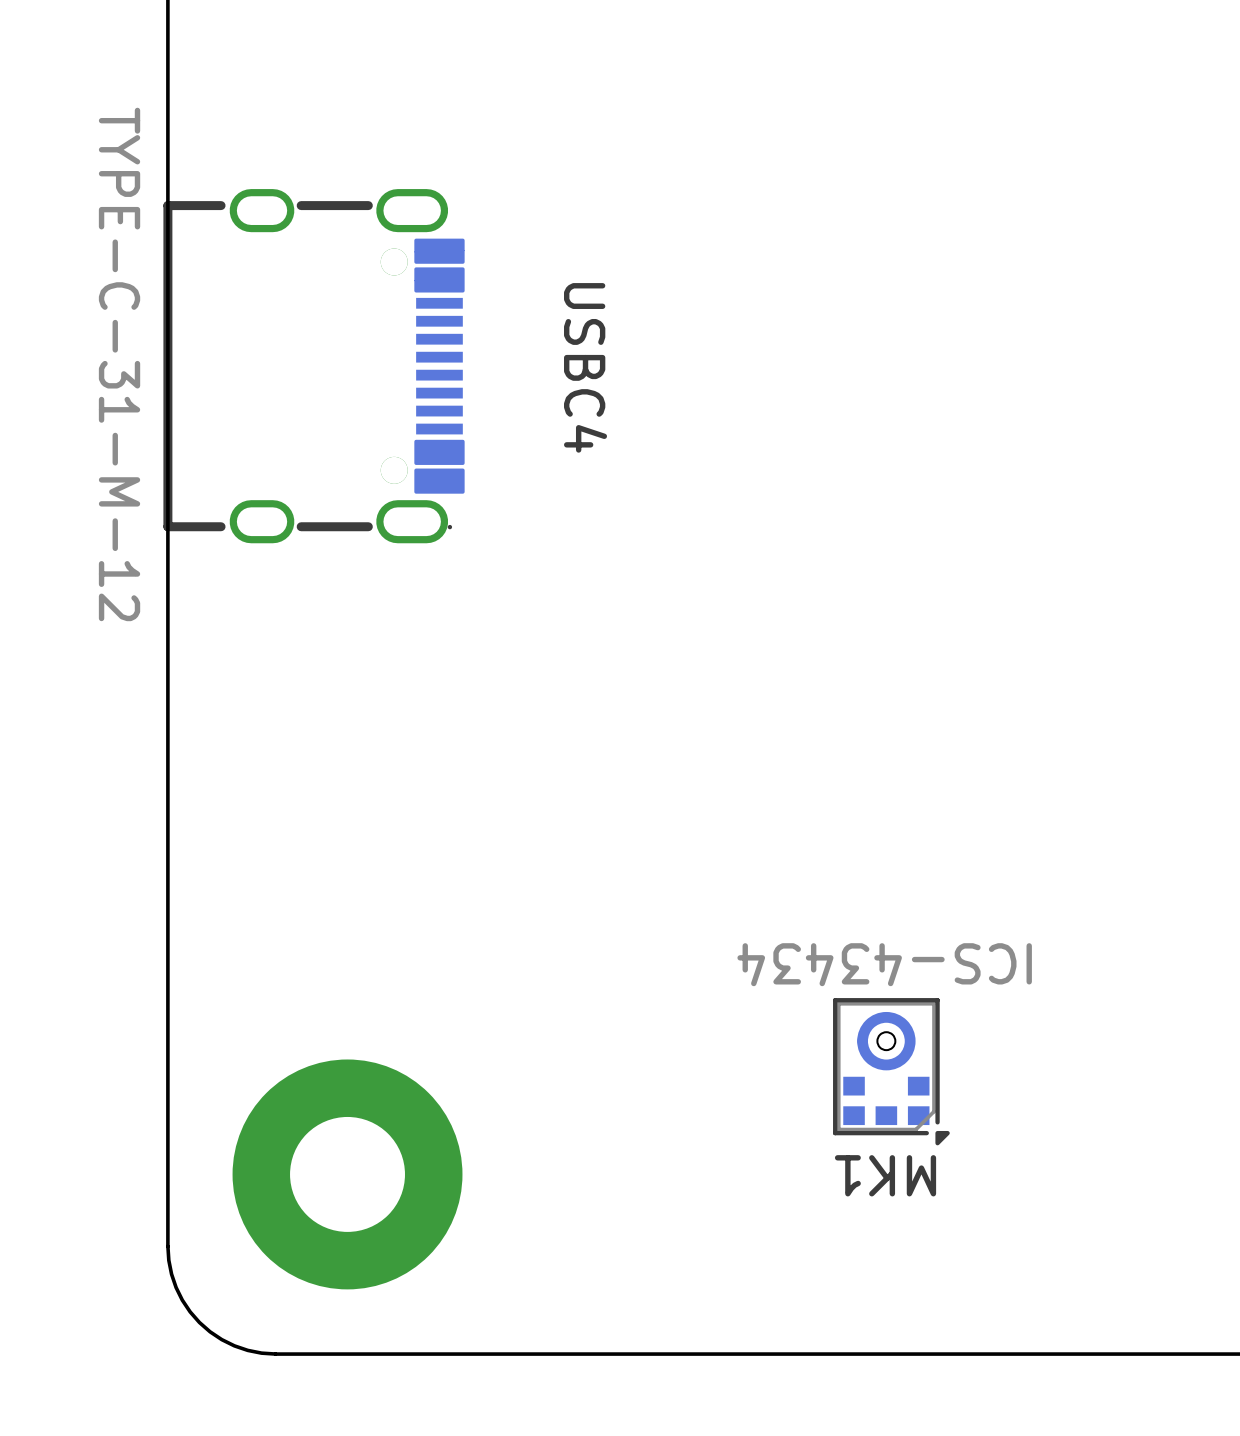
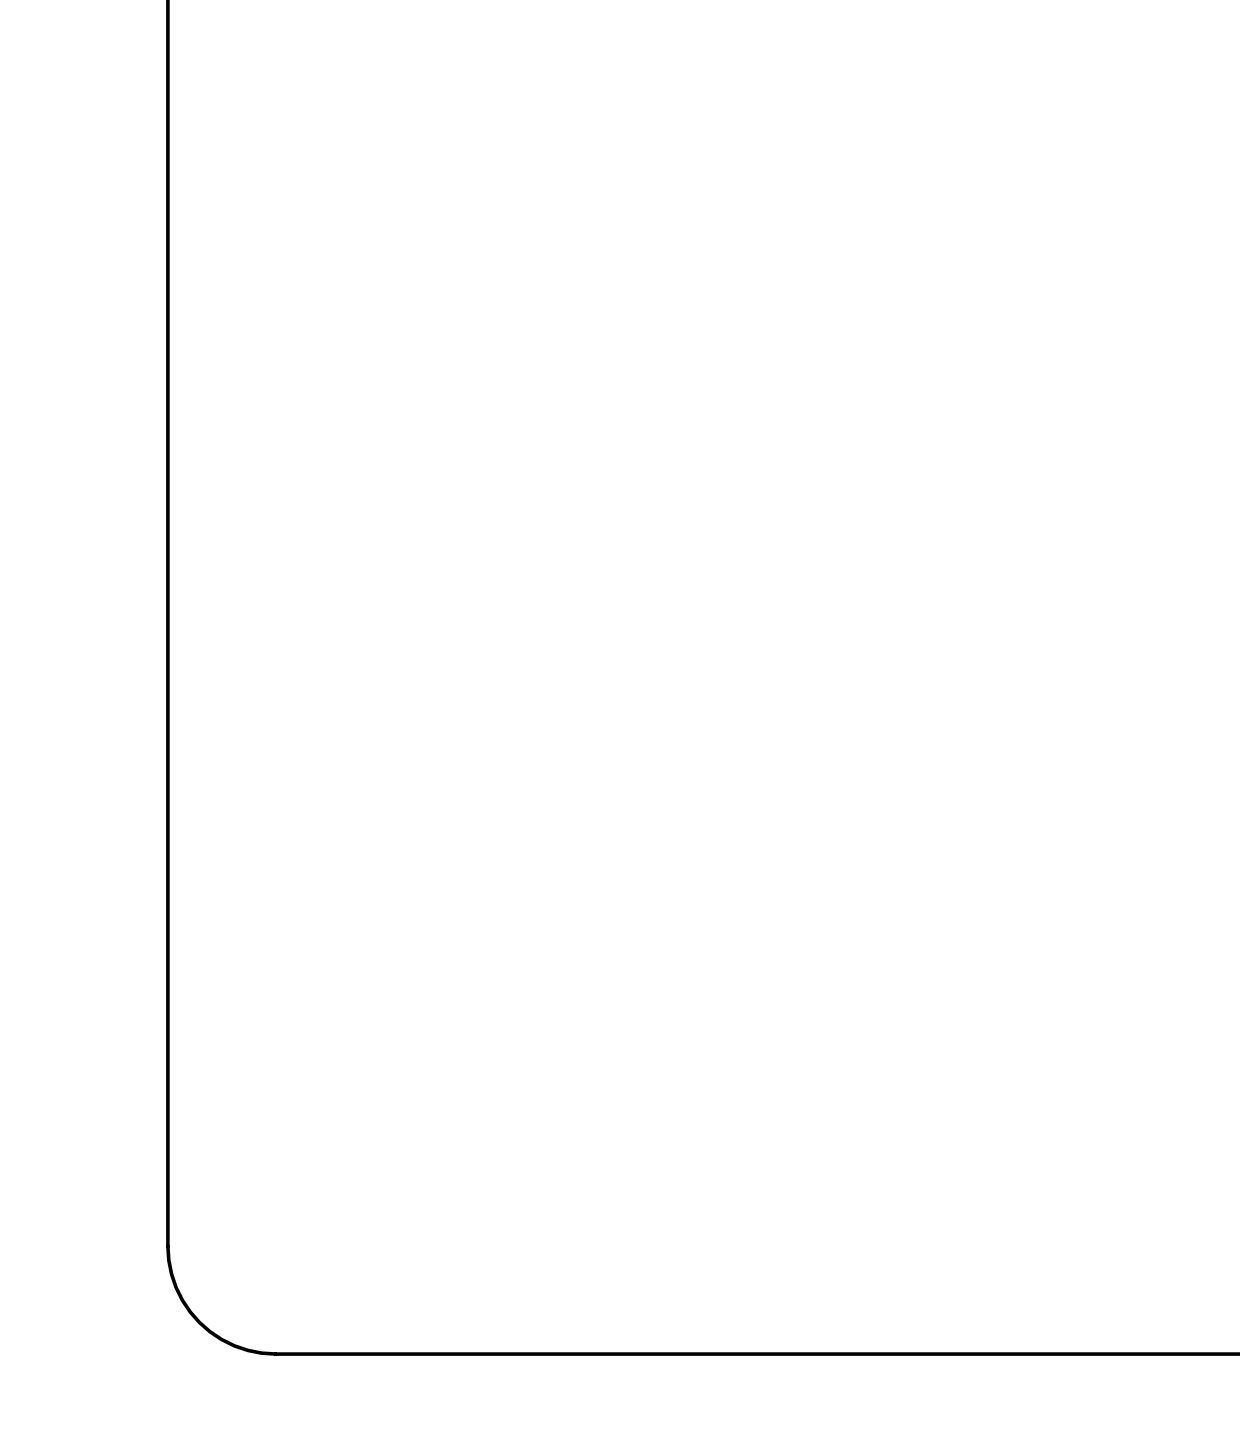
USBC4: TYPE-C-31-M-12 (314, 366) -> none
MK1: ICS-43434 (891, 1071) -> none
part: (347, 1174) -> none

